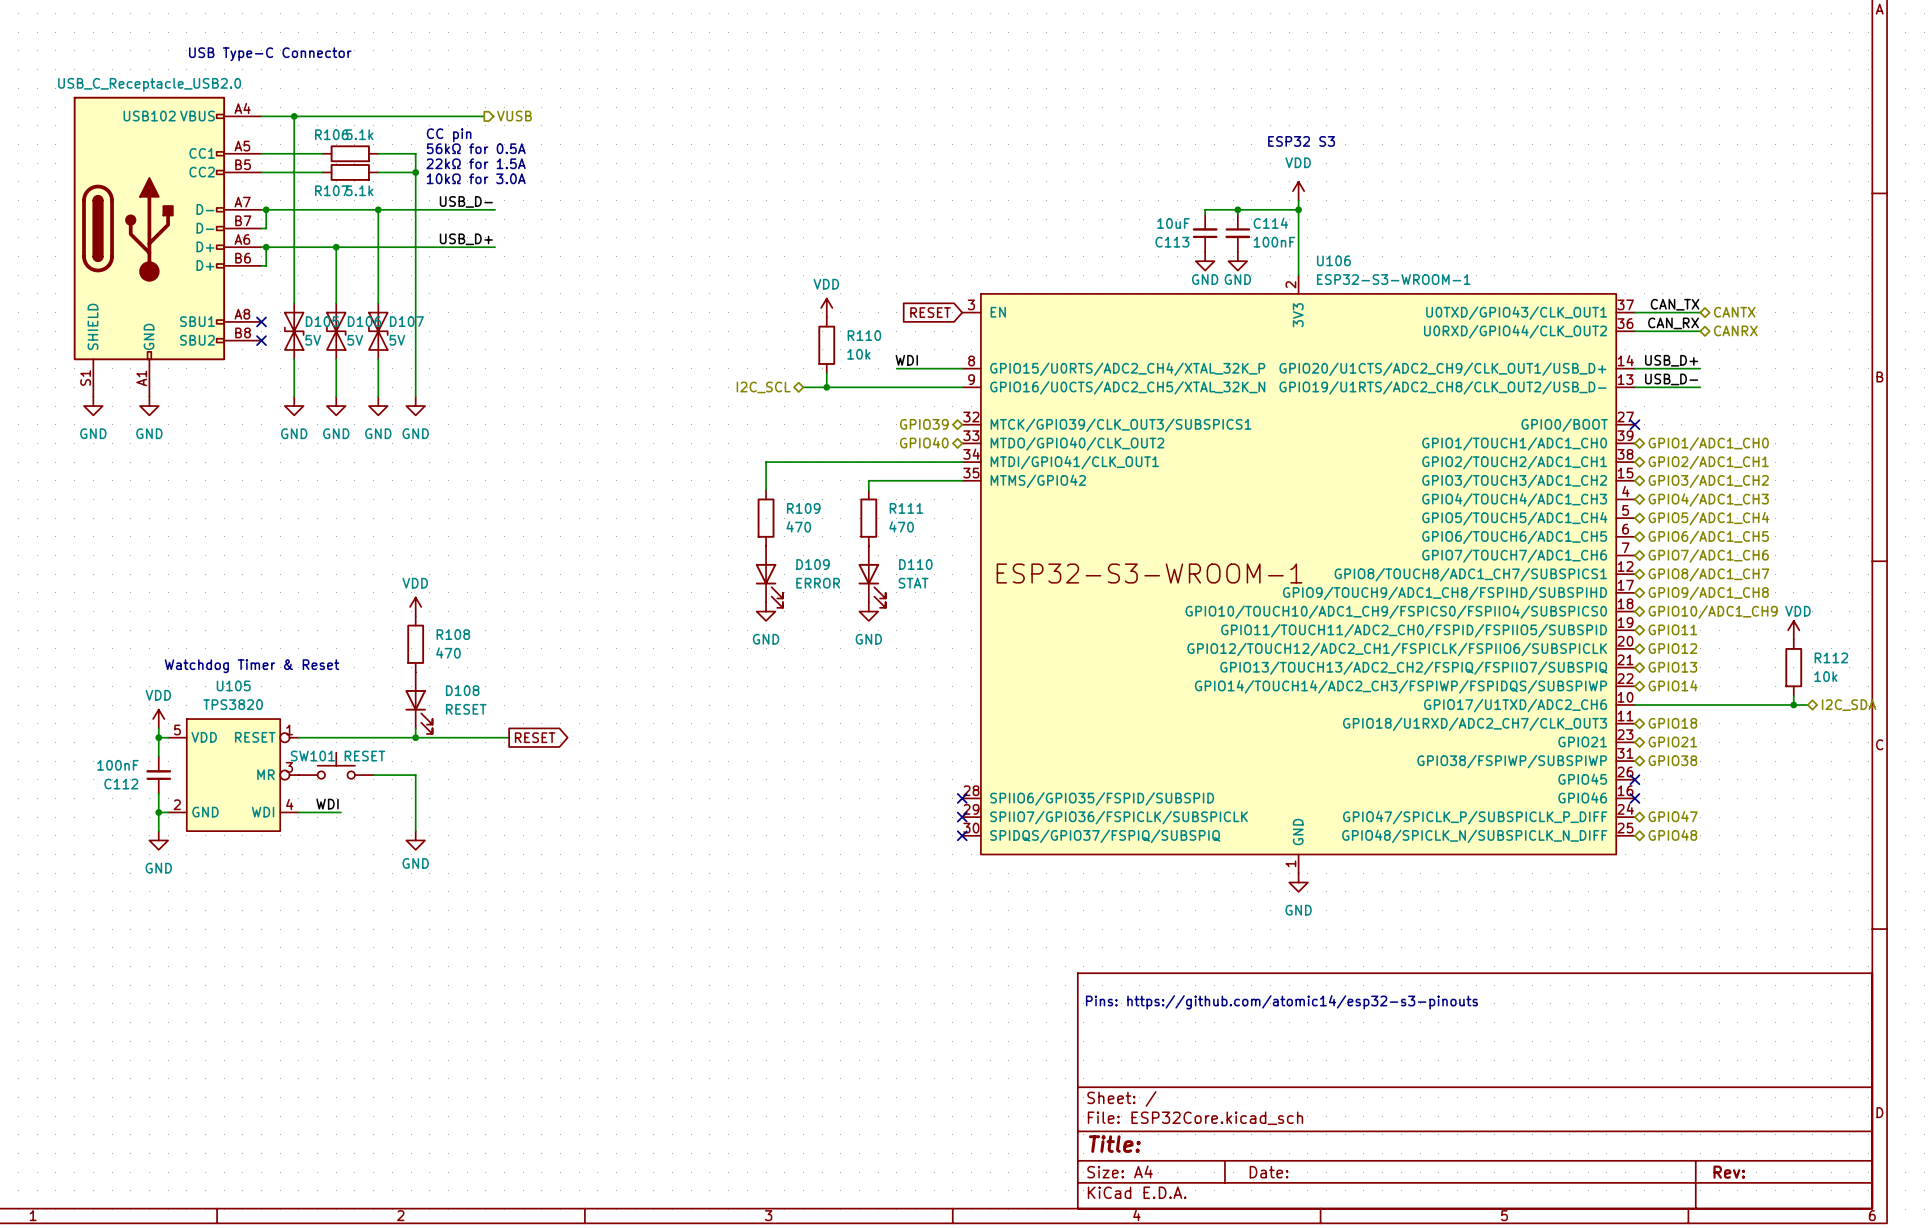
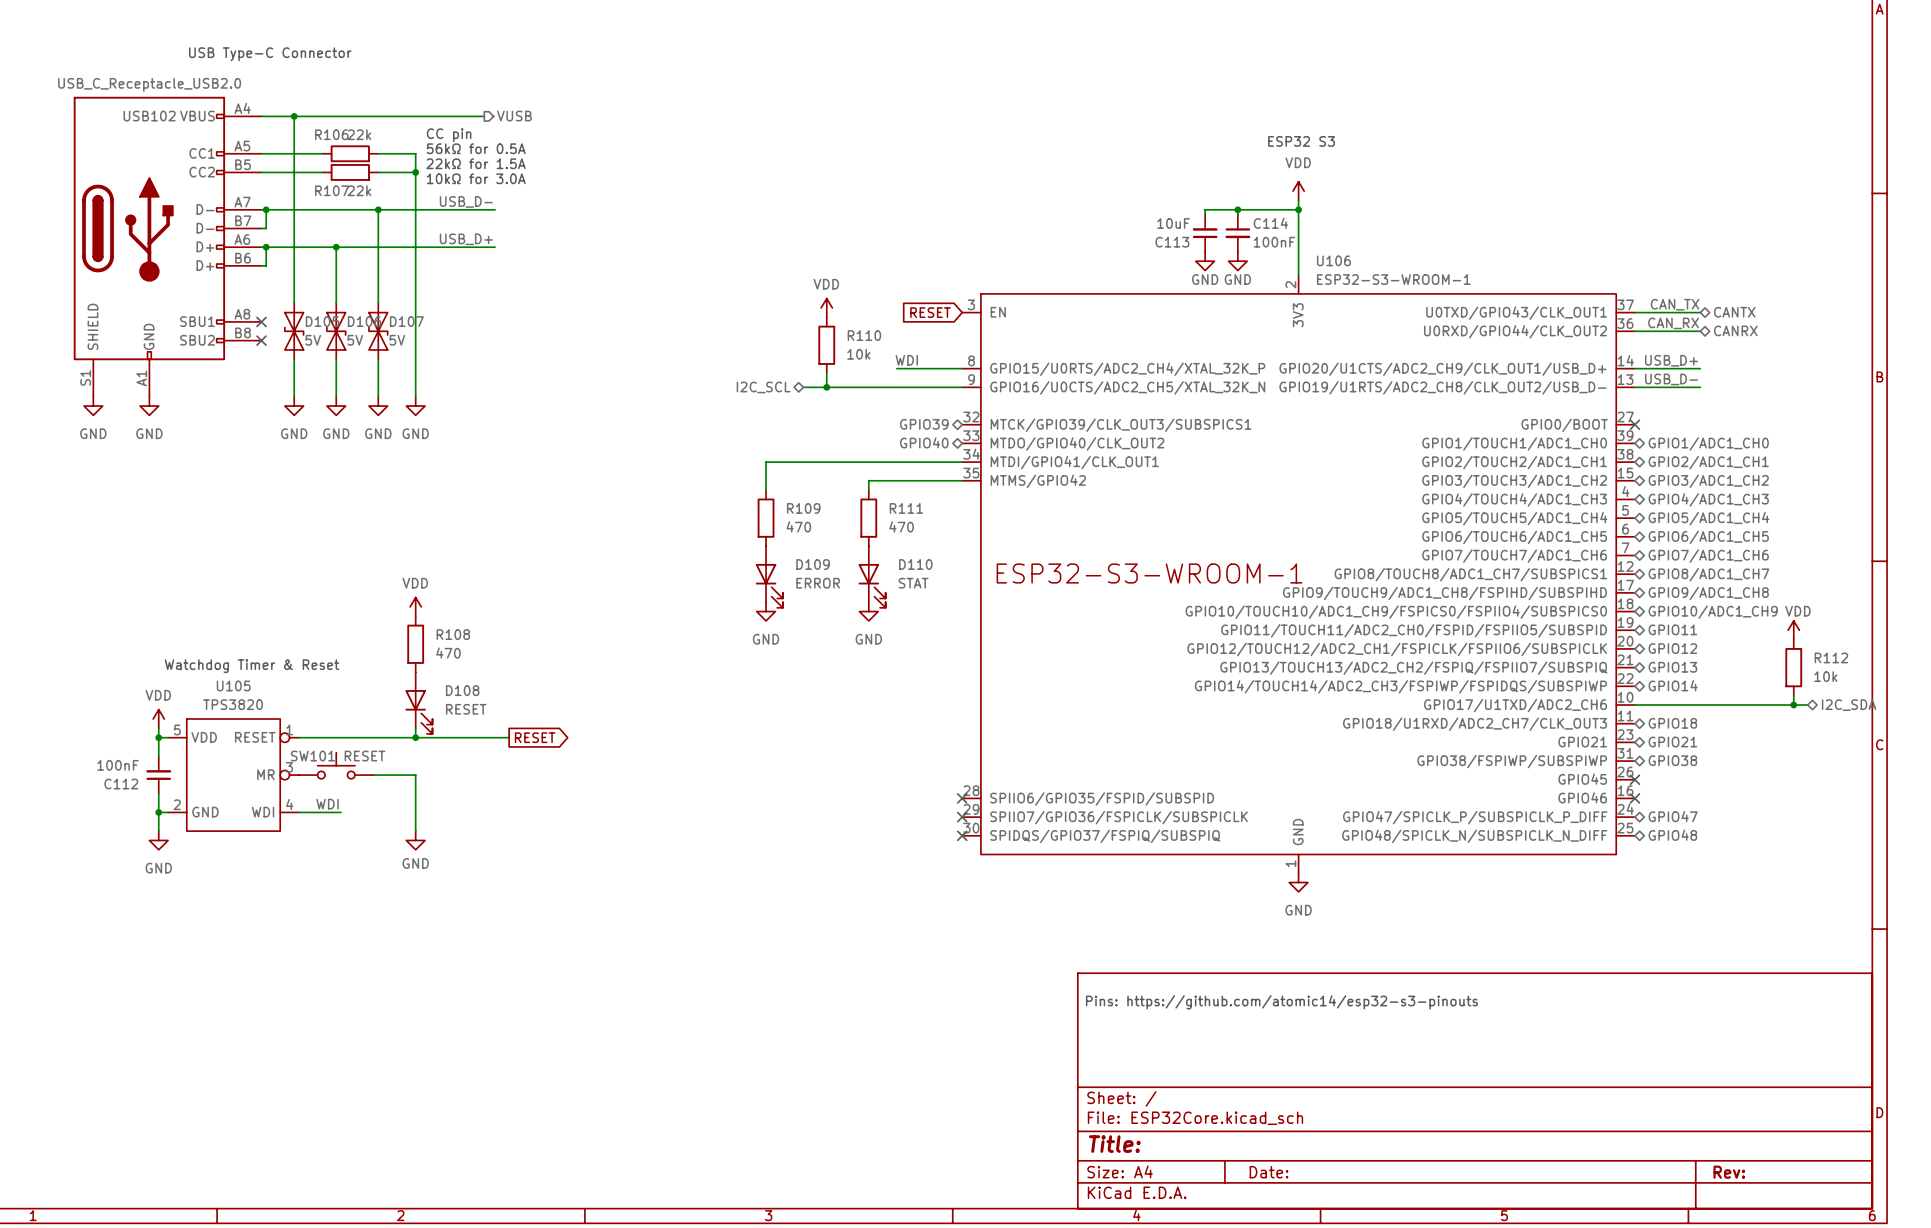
R106 value: 5.1k (359, 134) -> 22k (359, 134)
R107 value: 5.1k (359, 190) -> 22k (359, 190)

